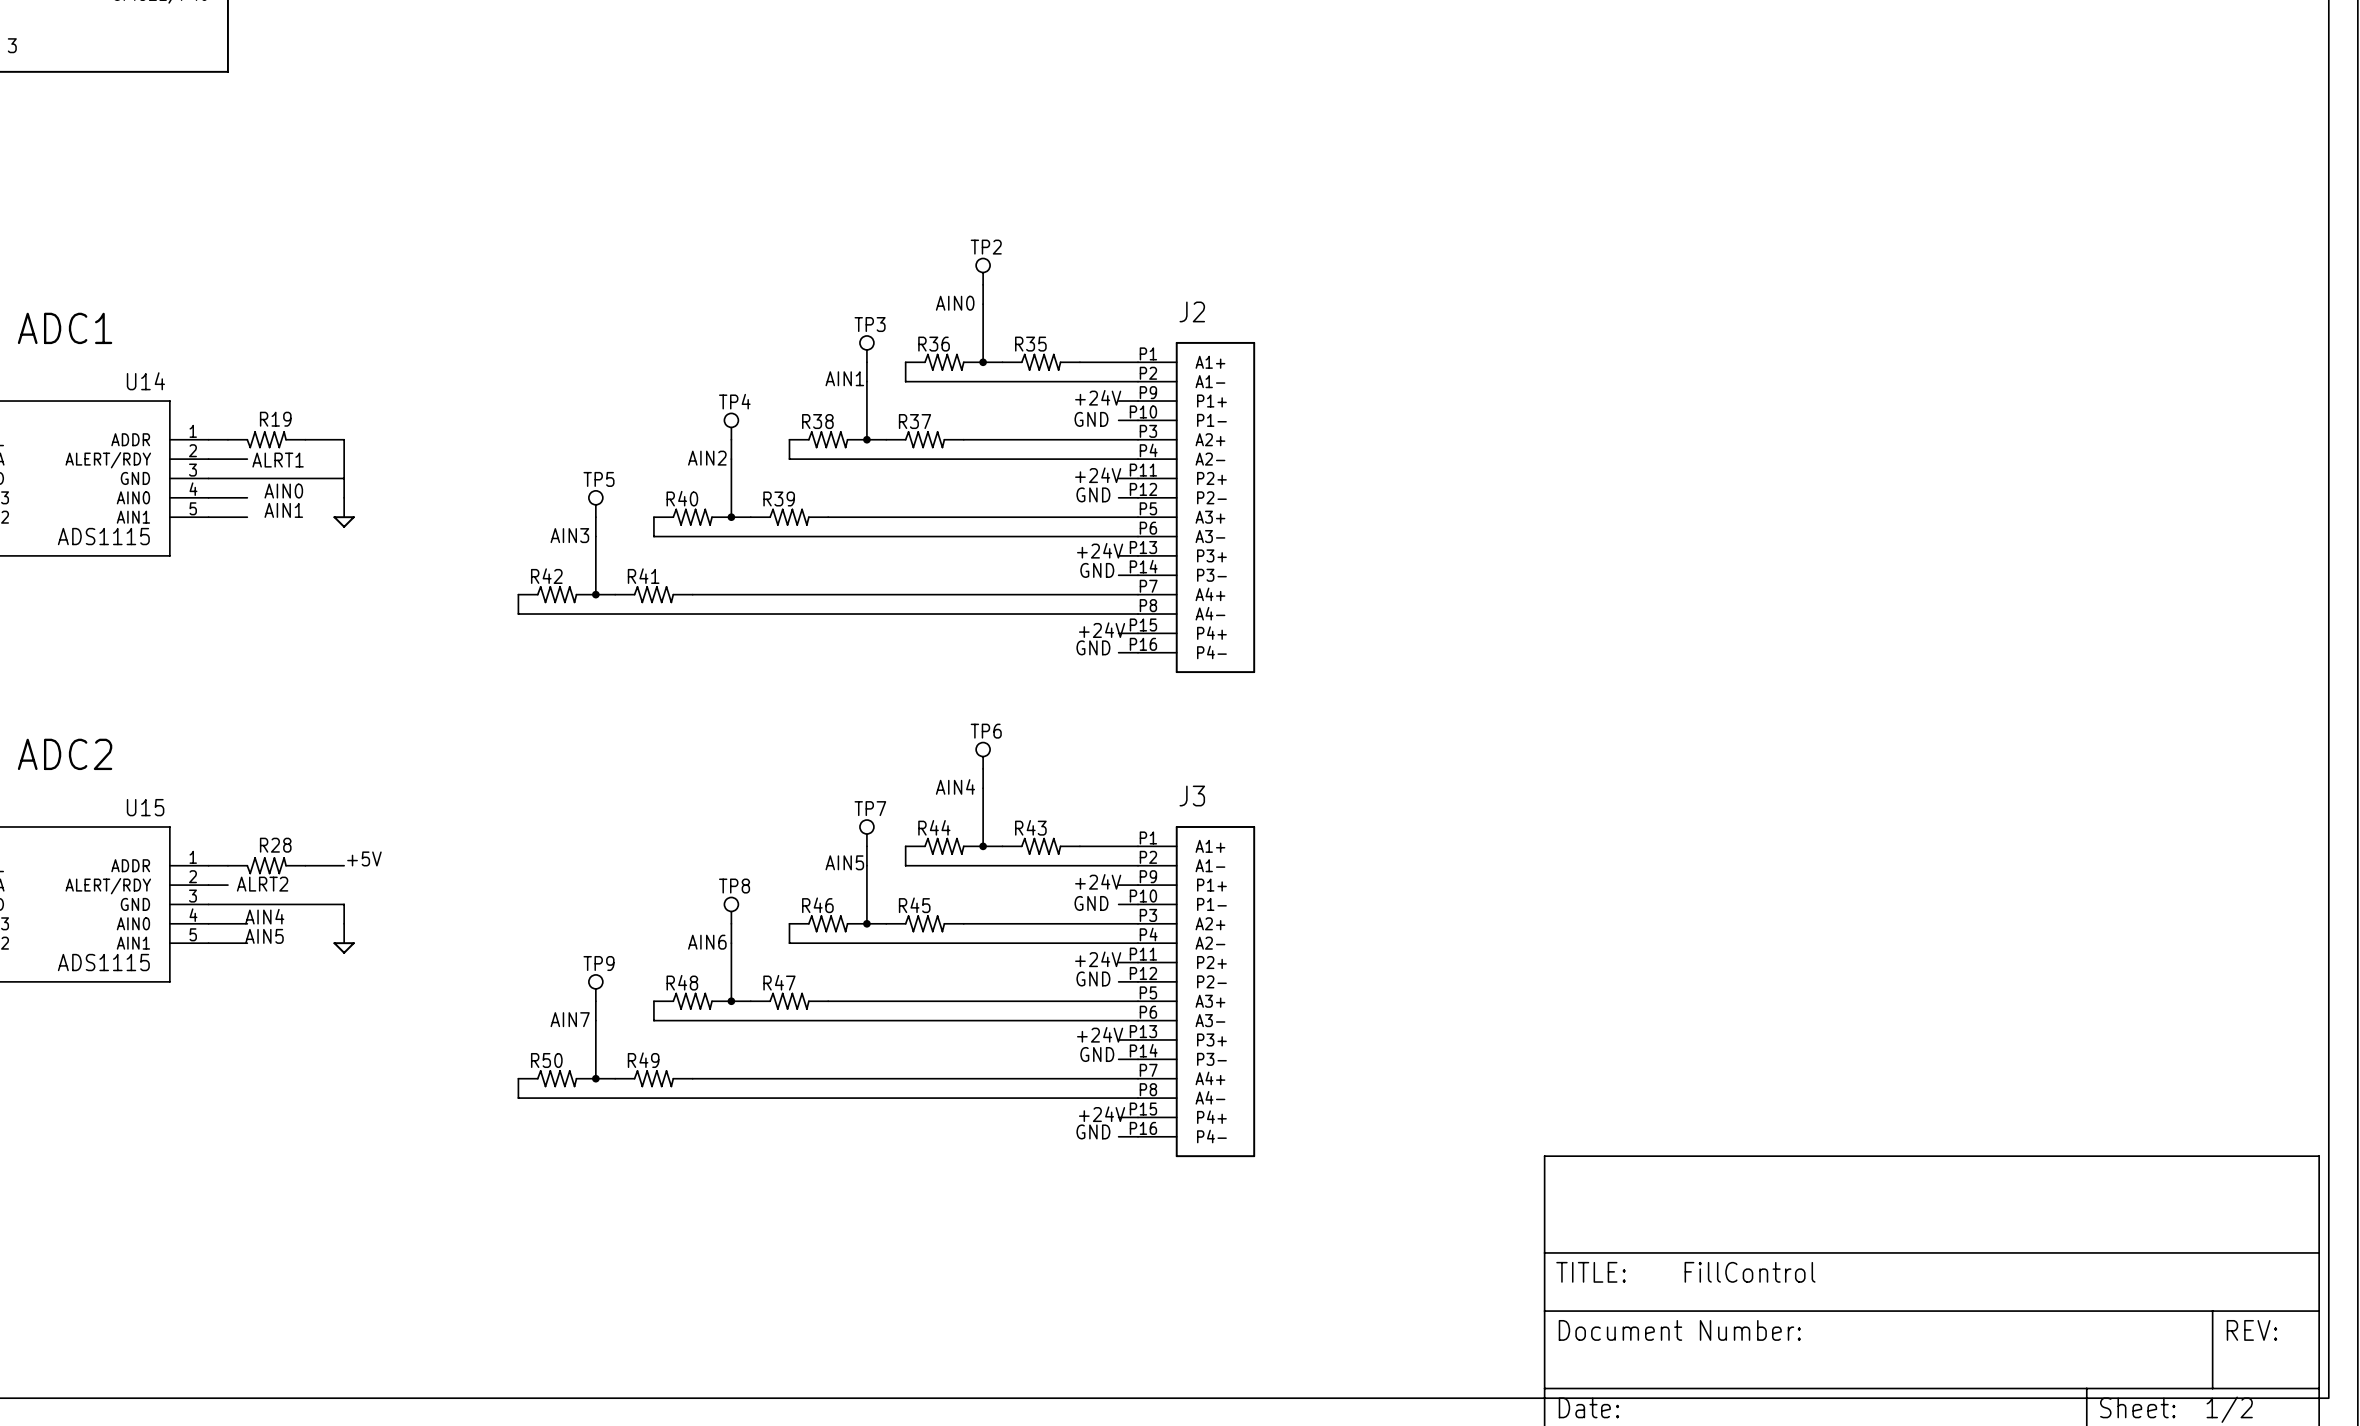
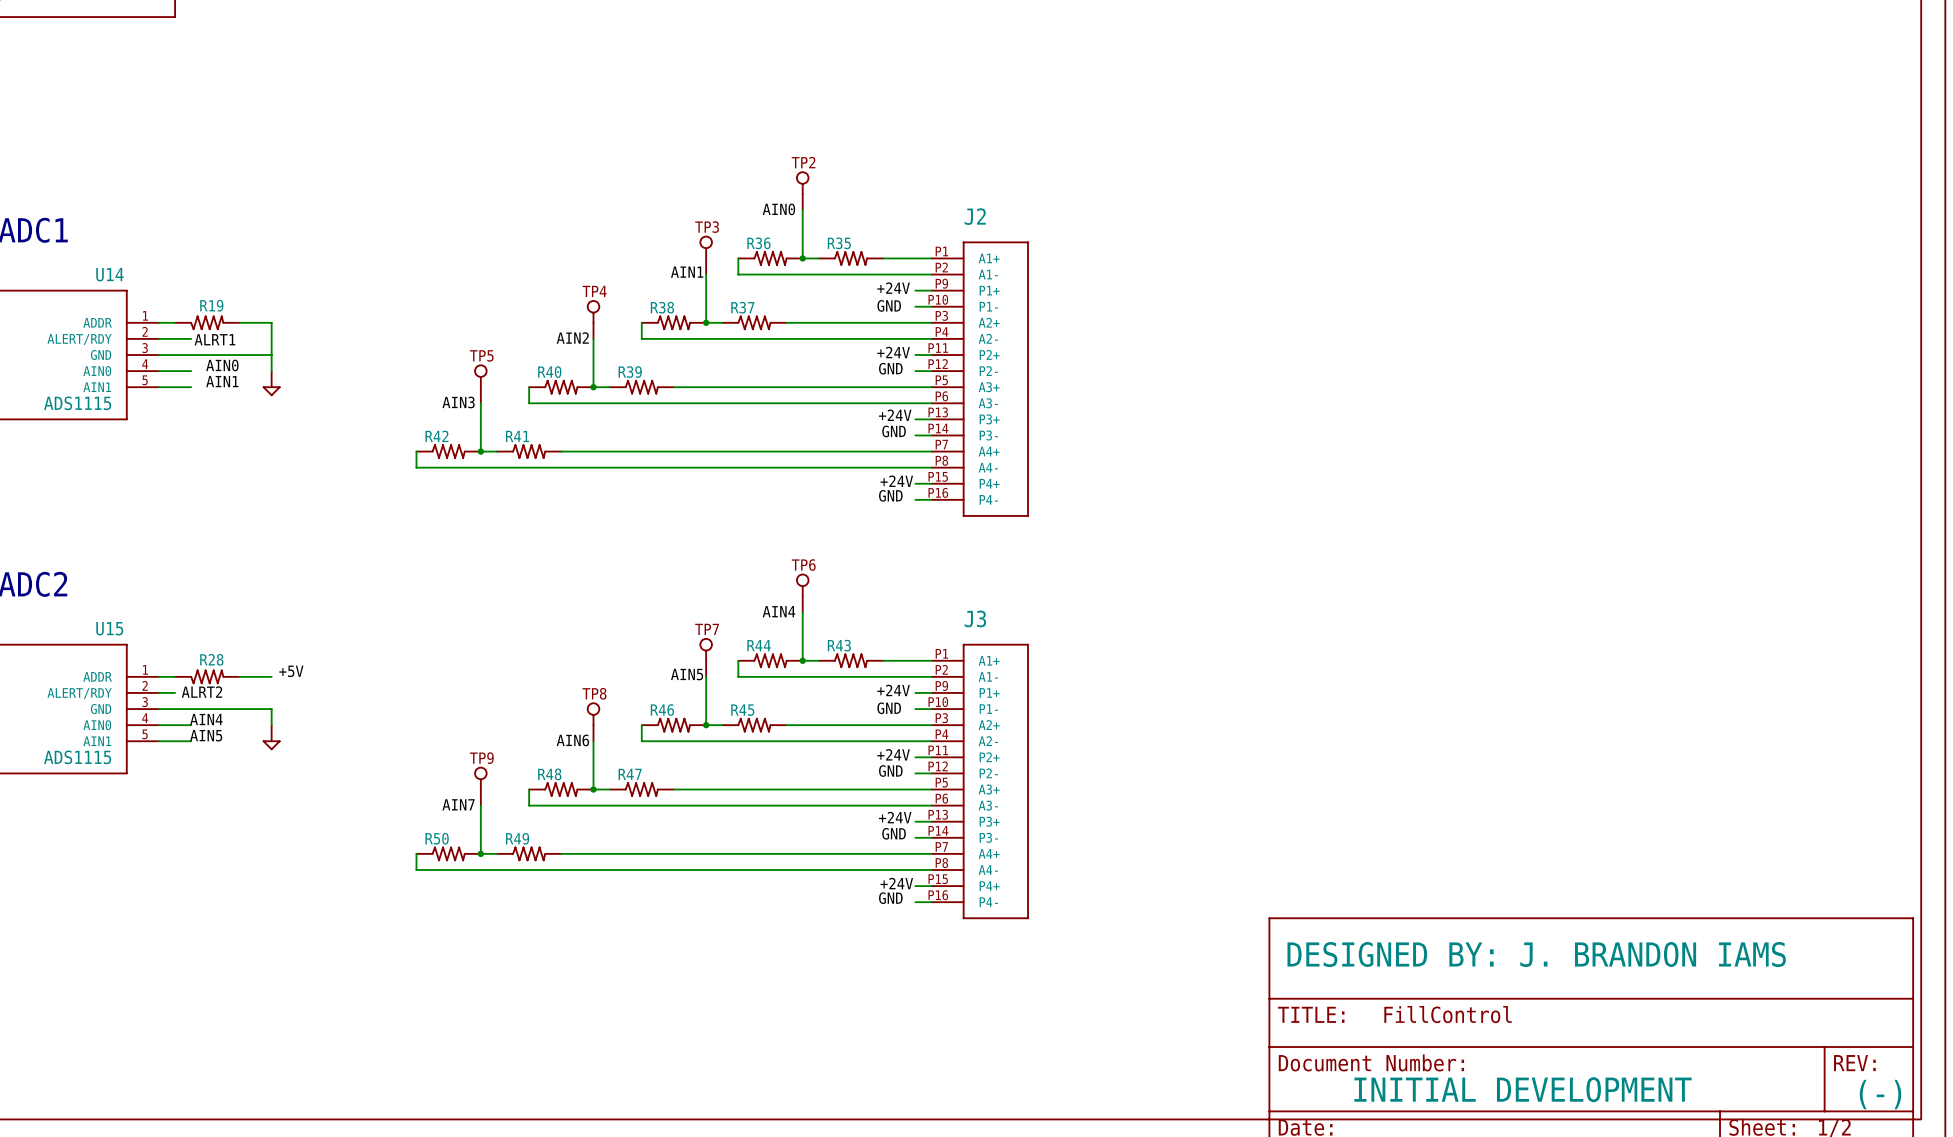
text: none -> DESIGNED BY: J. BRANDON IAMS (1536, 954)
text: none -> INITIAL DEVELOPMENT (1523, 1089)
text: none -> (-) (1880, 1094)

